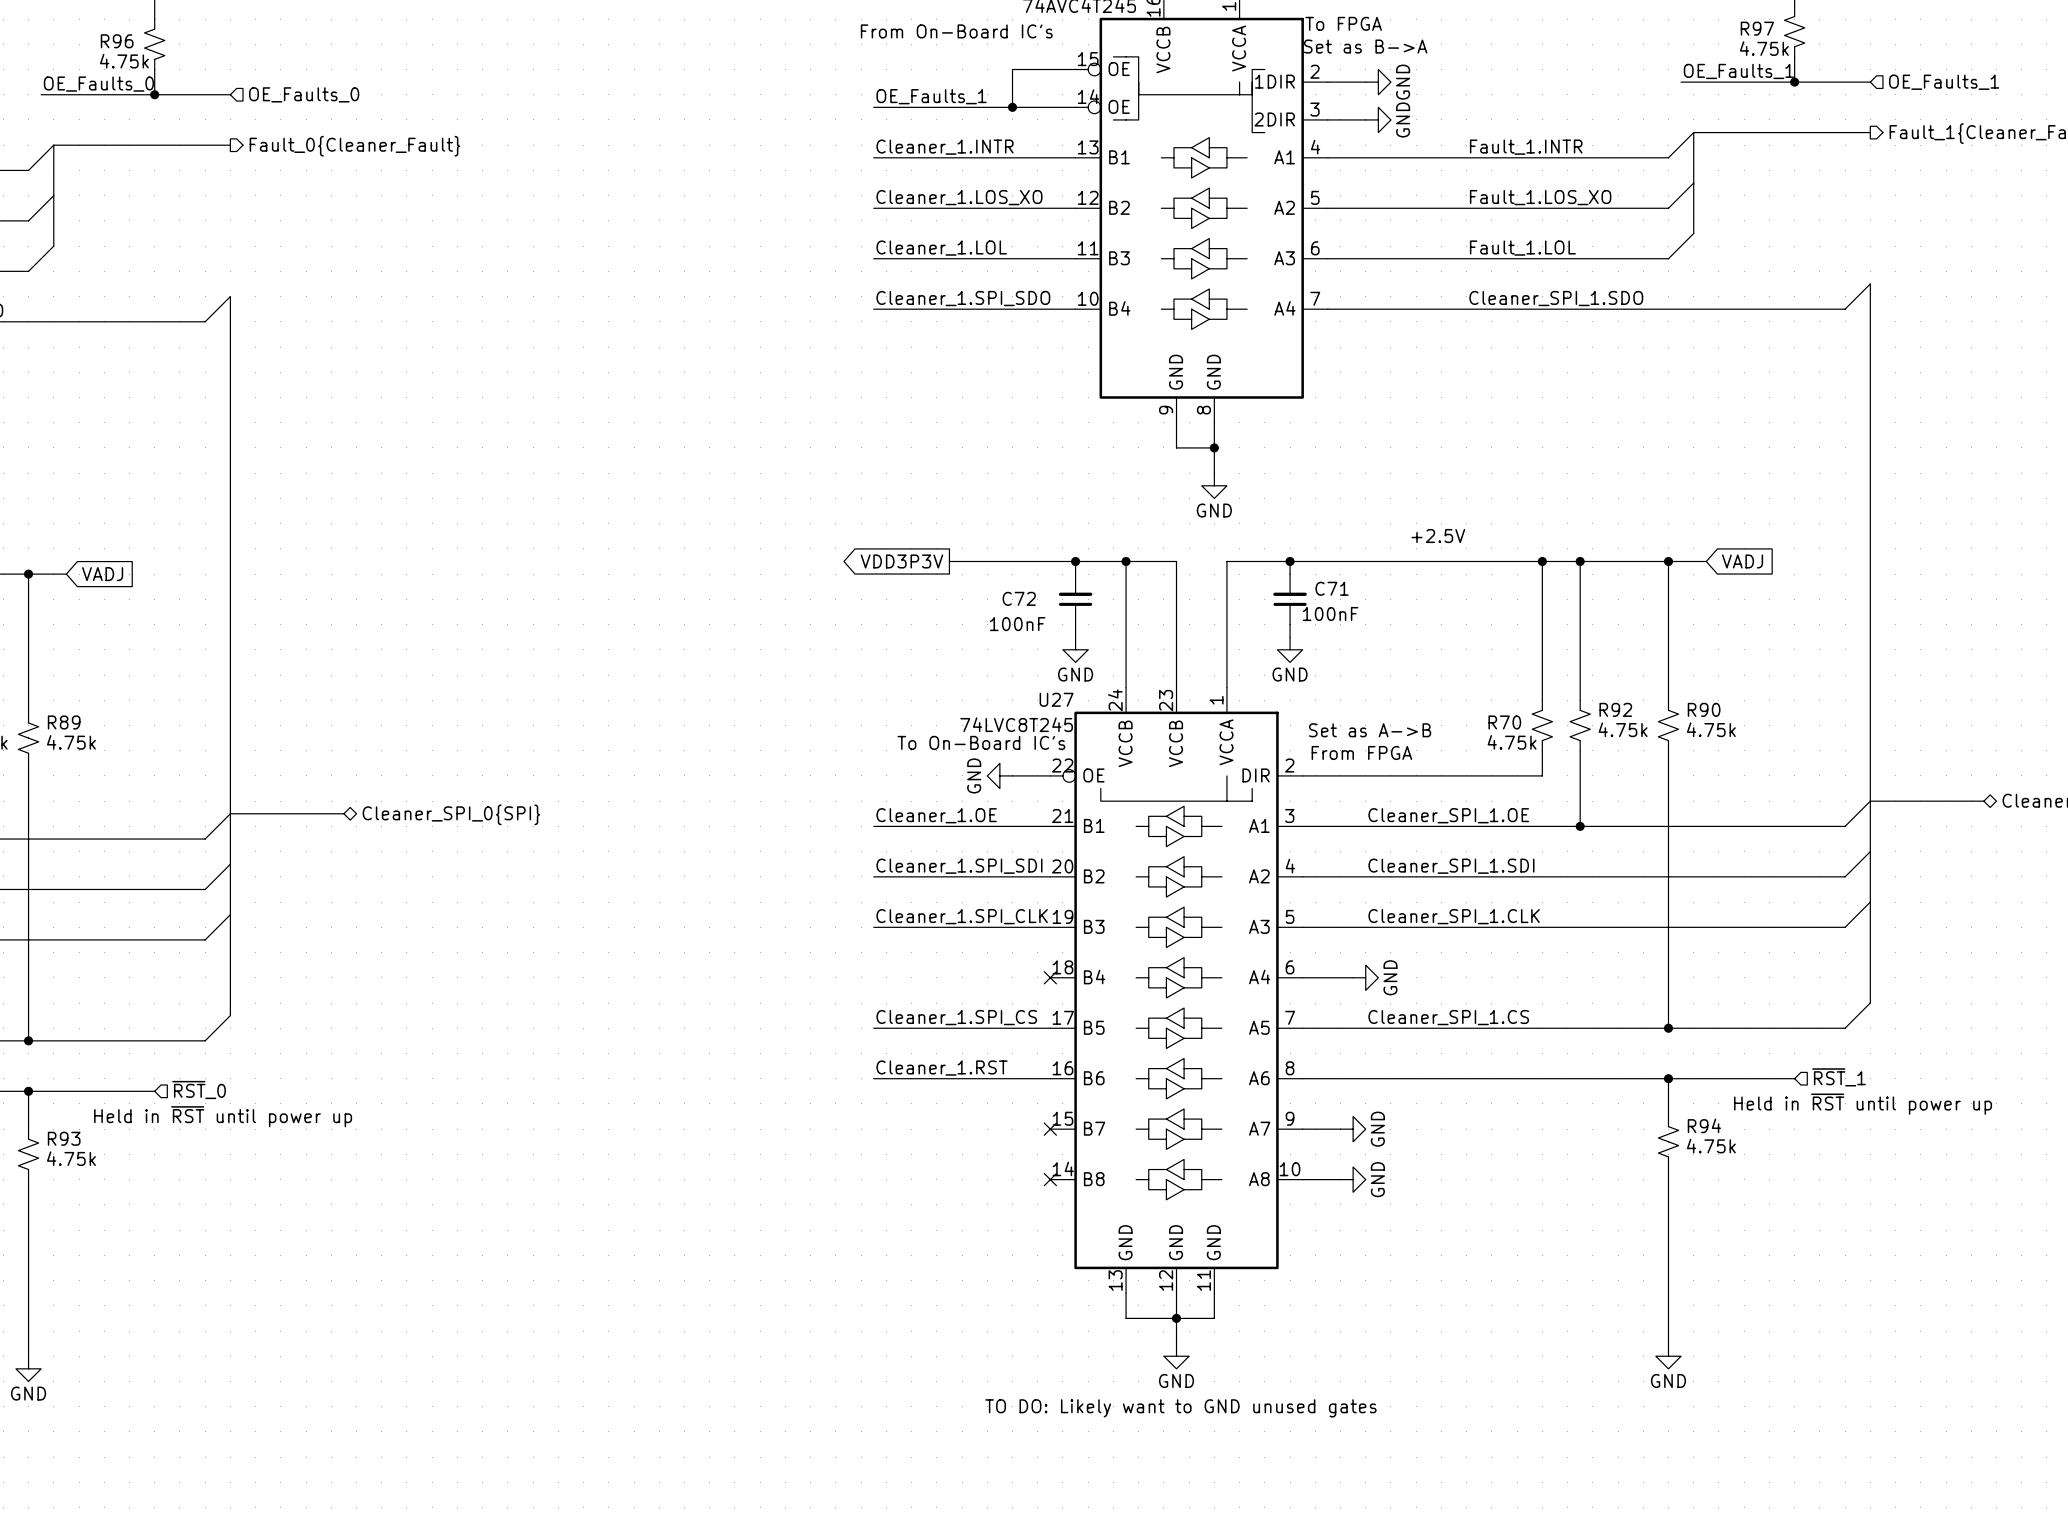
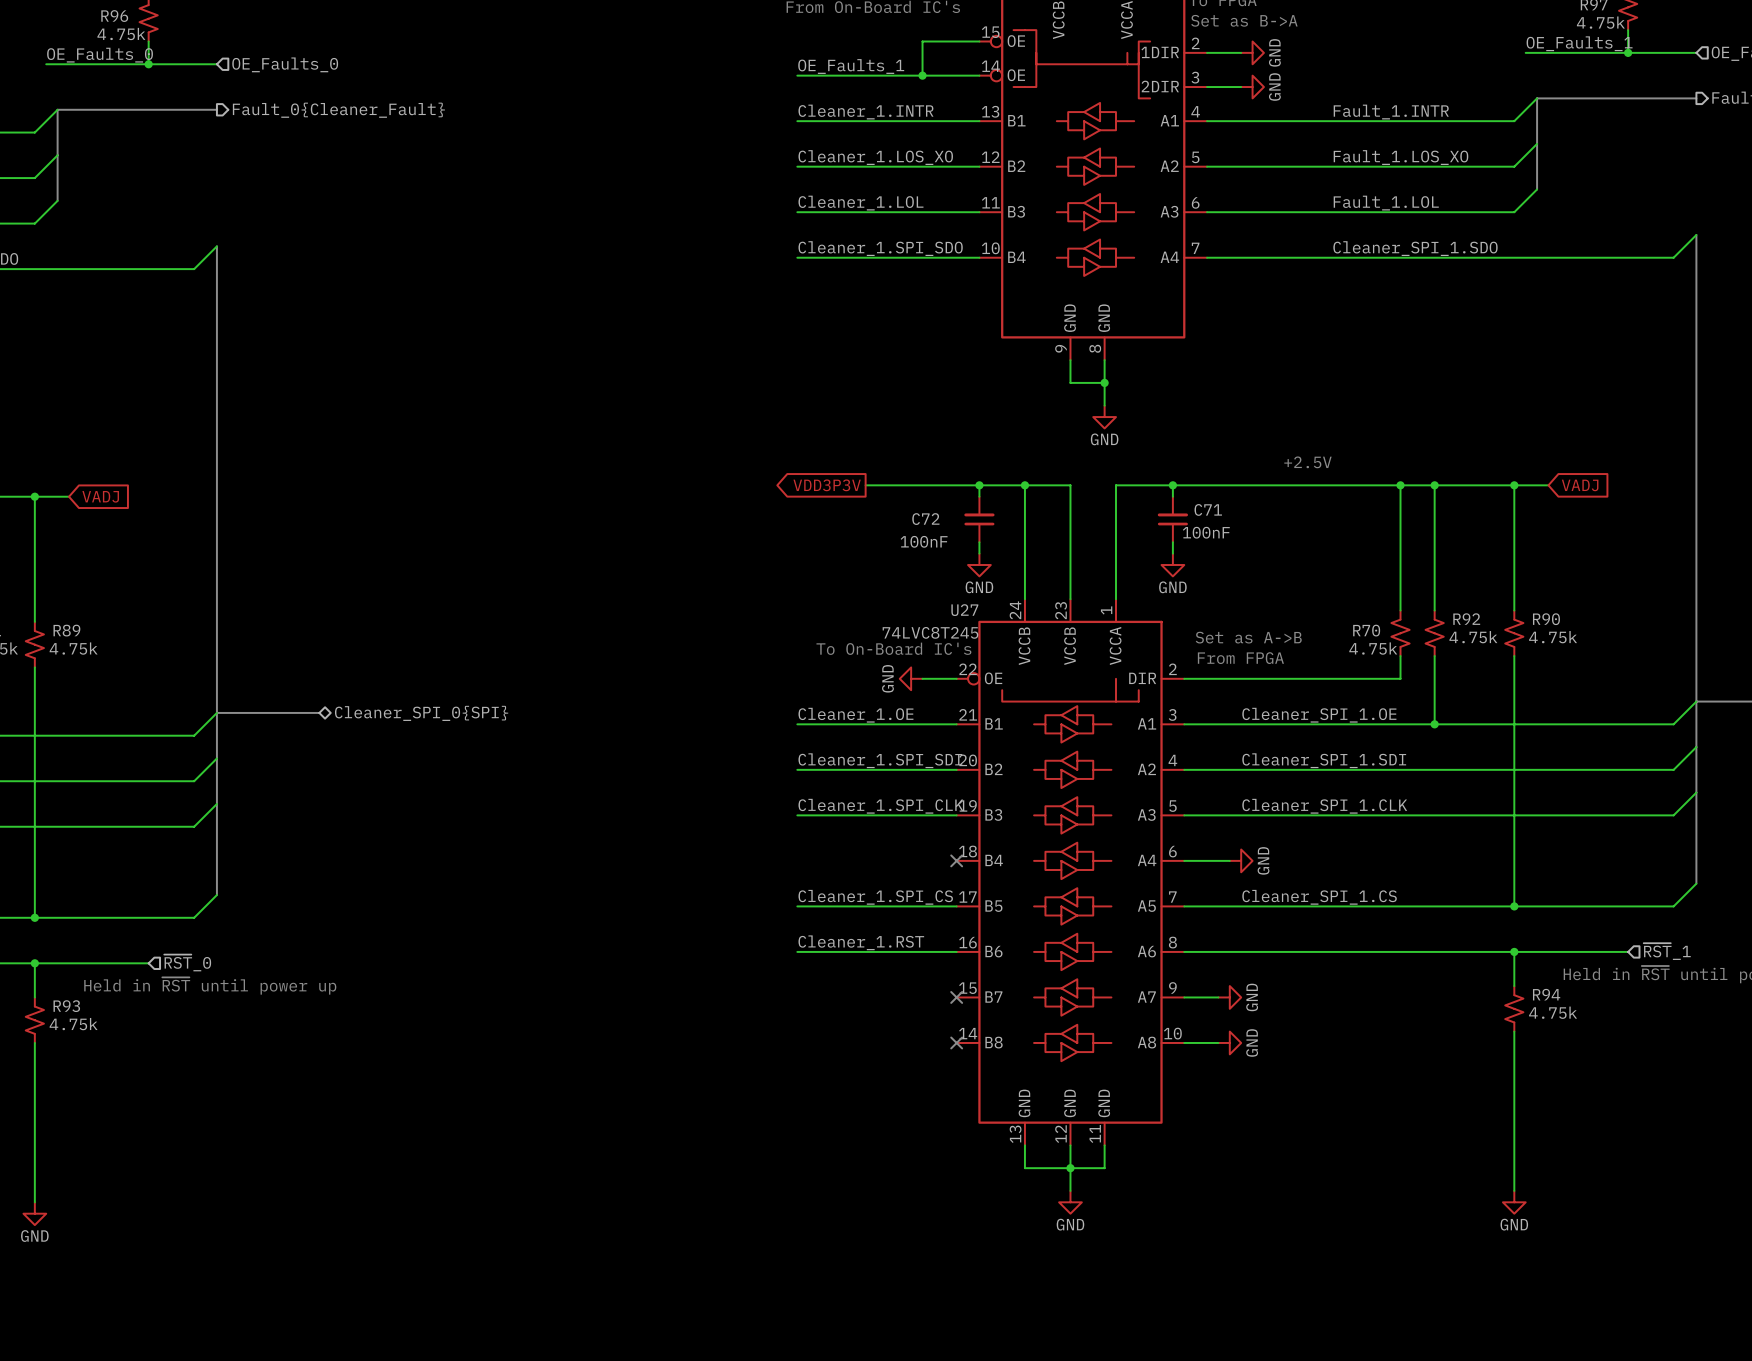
text: TO DO: Likely want to GND unused gates (1180, 1408) -> none

